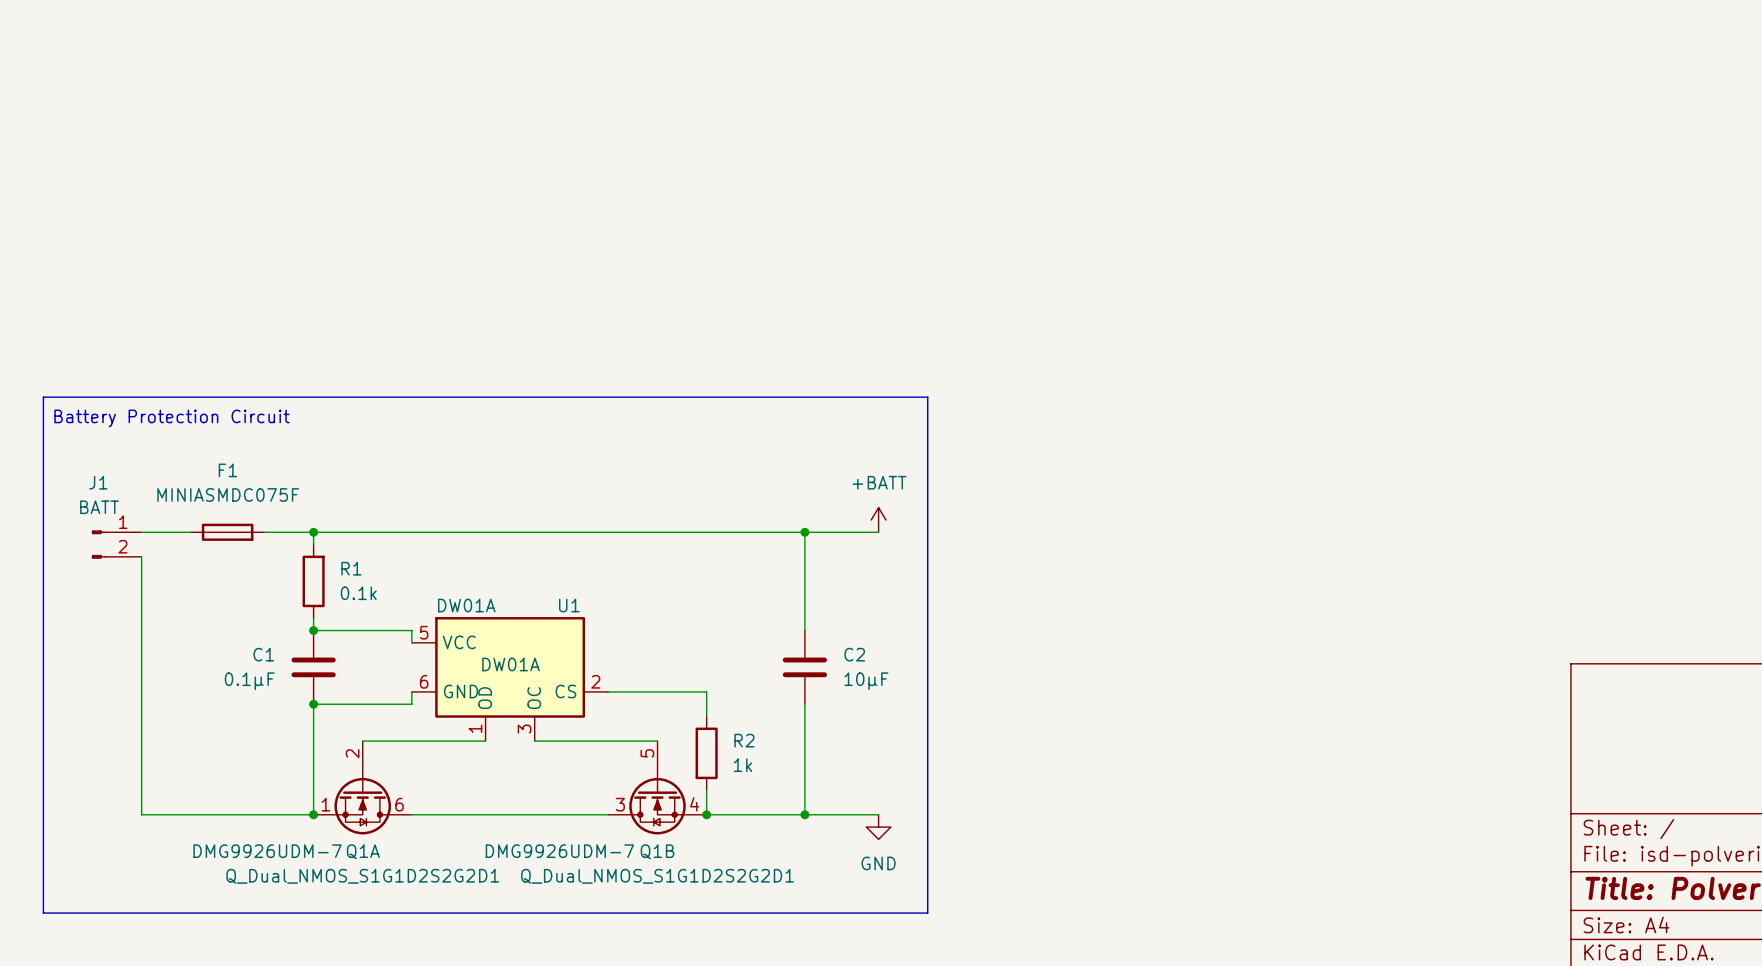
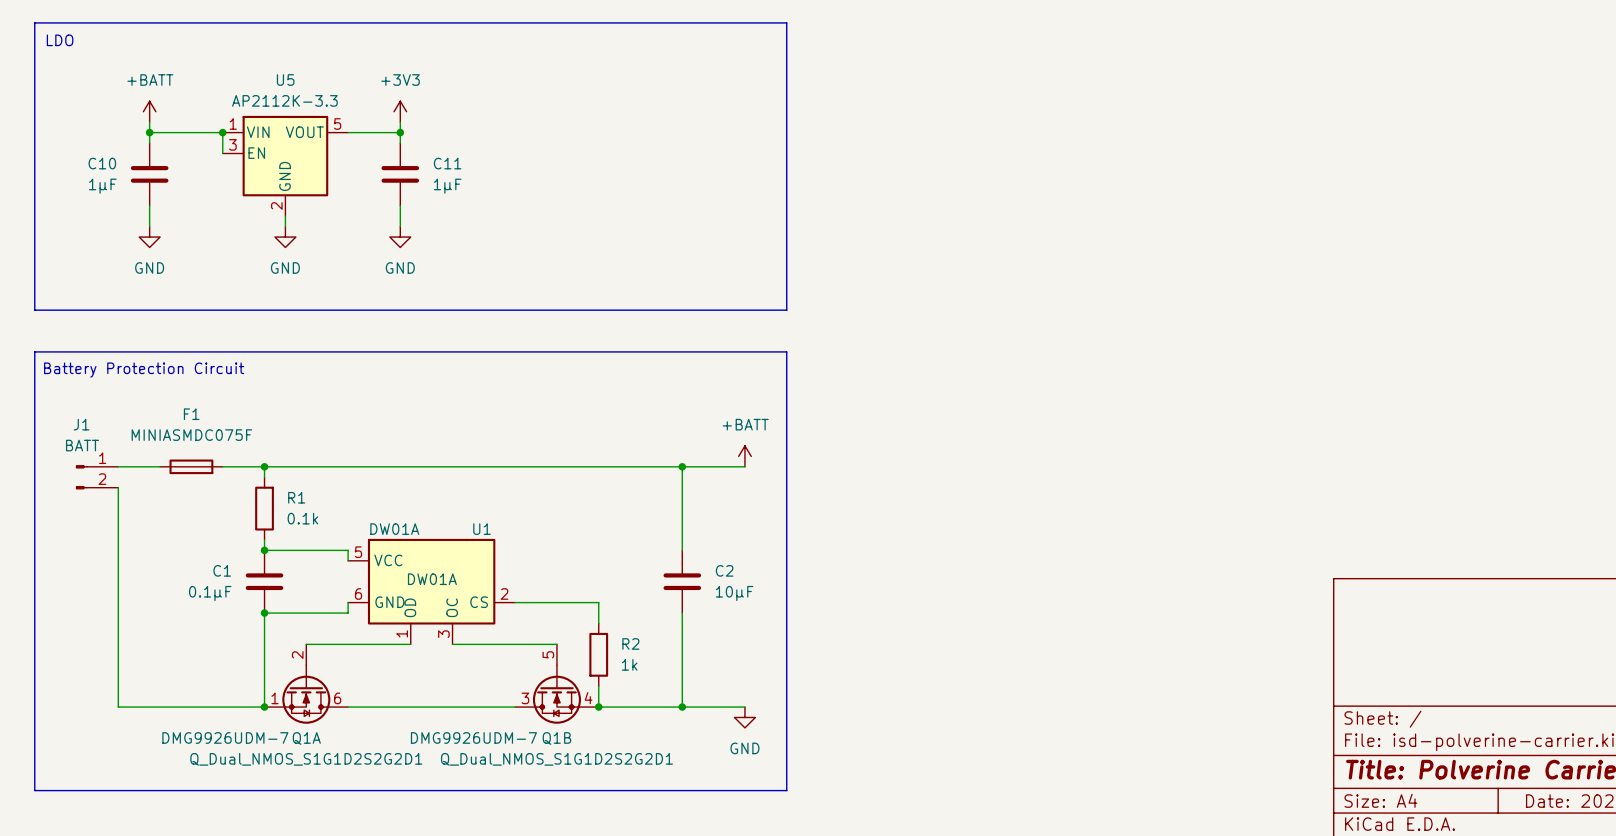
line: none -> (34, 22) (786, 22) (786, 310) (34, 310) (34, 22)
text: none -> LDO (60, 40)
power symbol: none -> +BATT (149, 111)
power symbol: none -> +3V3 (400, 111)
wire: none -> (149, 122) (149, 143)
wire: none -> (400, 122) (400, 143)
wire: none -> (149, 132) (222, 132) (222, 153)
junction: none -> (149, 132)
junction: none -> (222, 132)
wire: none -> (348, 132) (400, 132)
junction: none -> (400, 132)
U5: none -> AP2112K-3.3 (285, 166)
C10: none -> 1µF (149, 174)
C11: none -> 1µF (400, 174)
wire: none -> (149, 205) (149, 226)
wire: none -> (400, 205) (400, 226)
wire: none -> (285, 216) (285, 226)
power symbol: none -> GND (149, 237)
power symbol: none -> GND (285, 237)
power symbol: none -> GND (400, 237)

